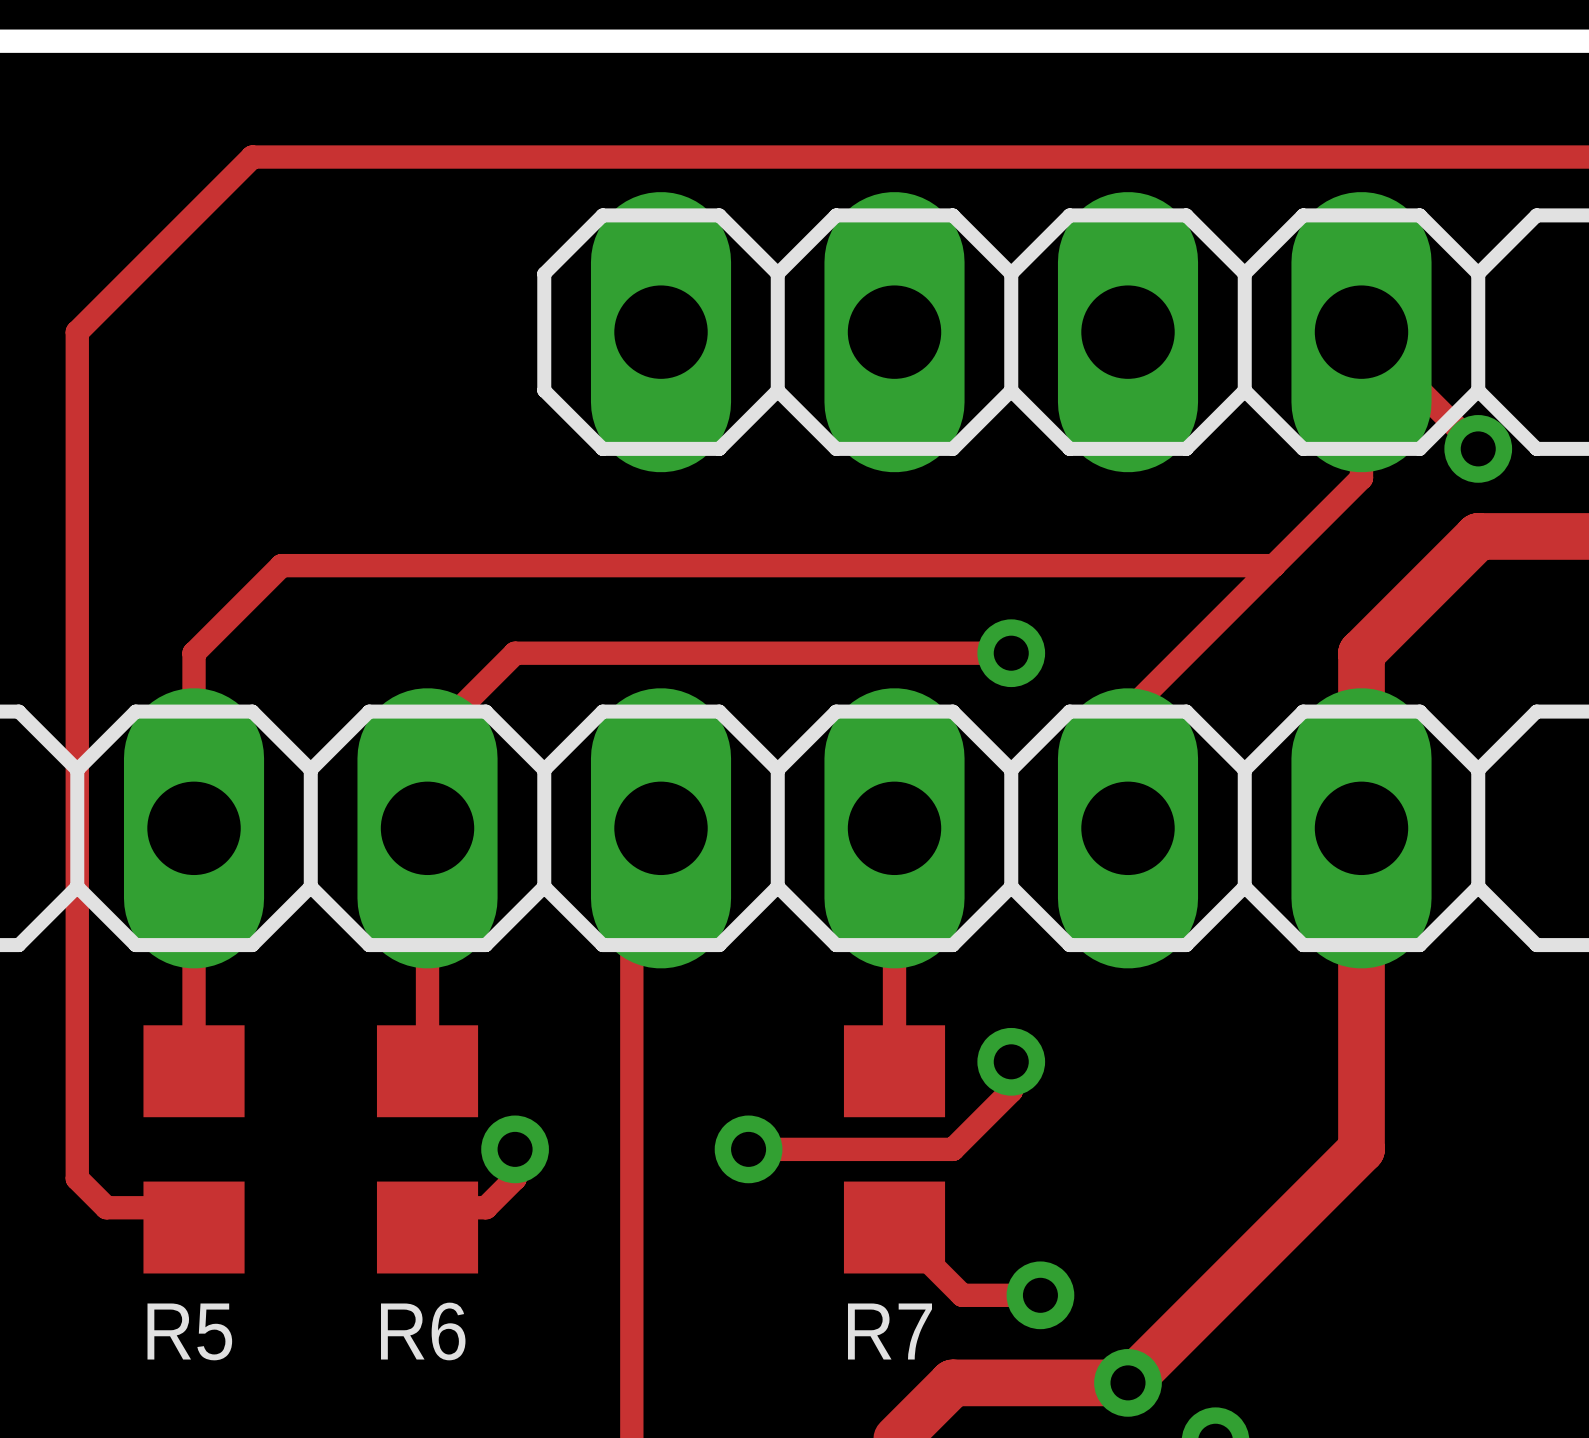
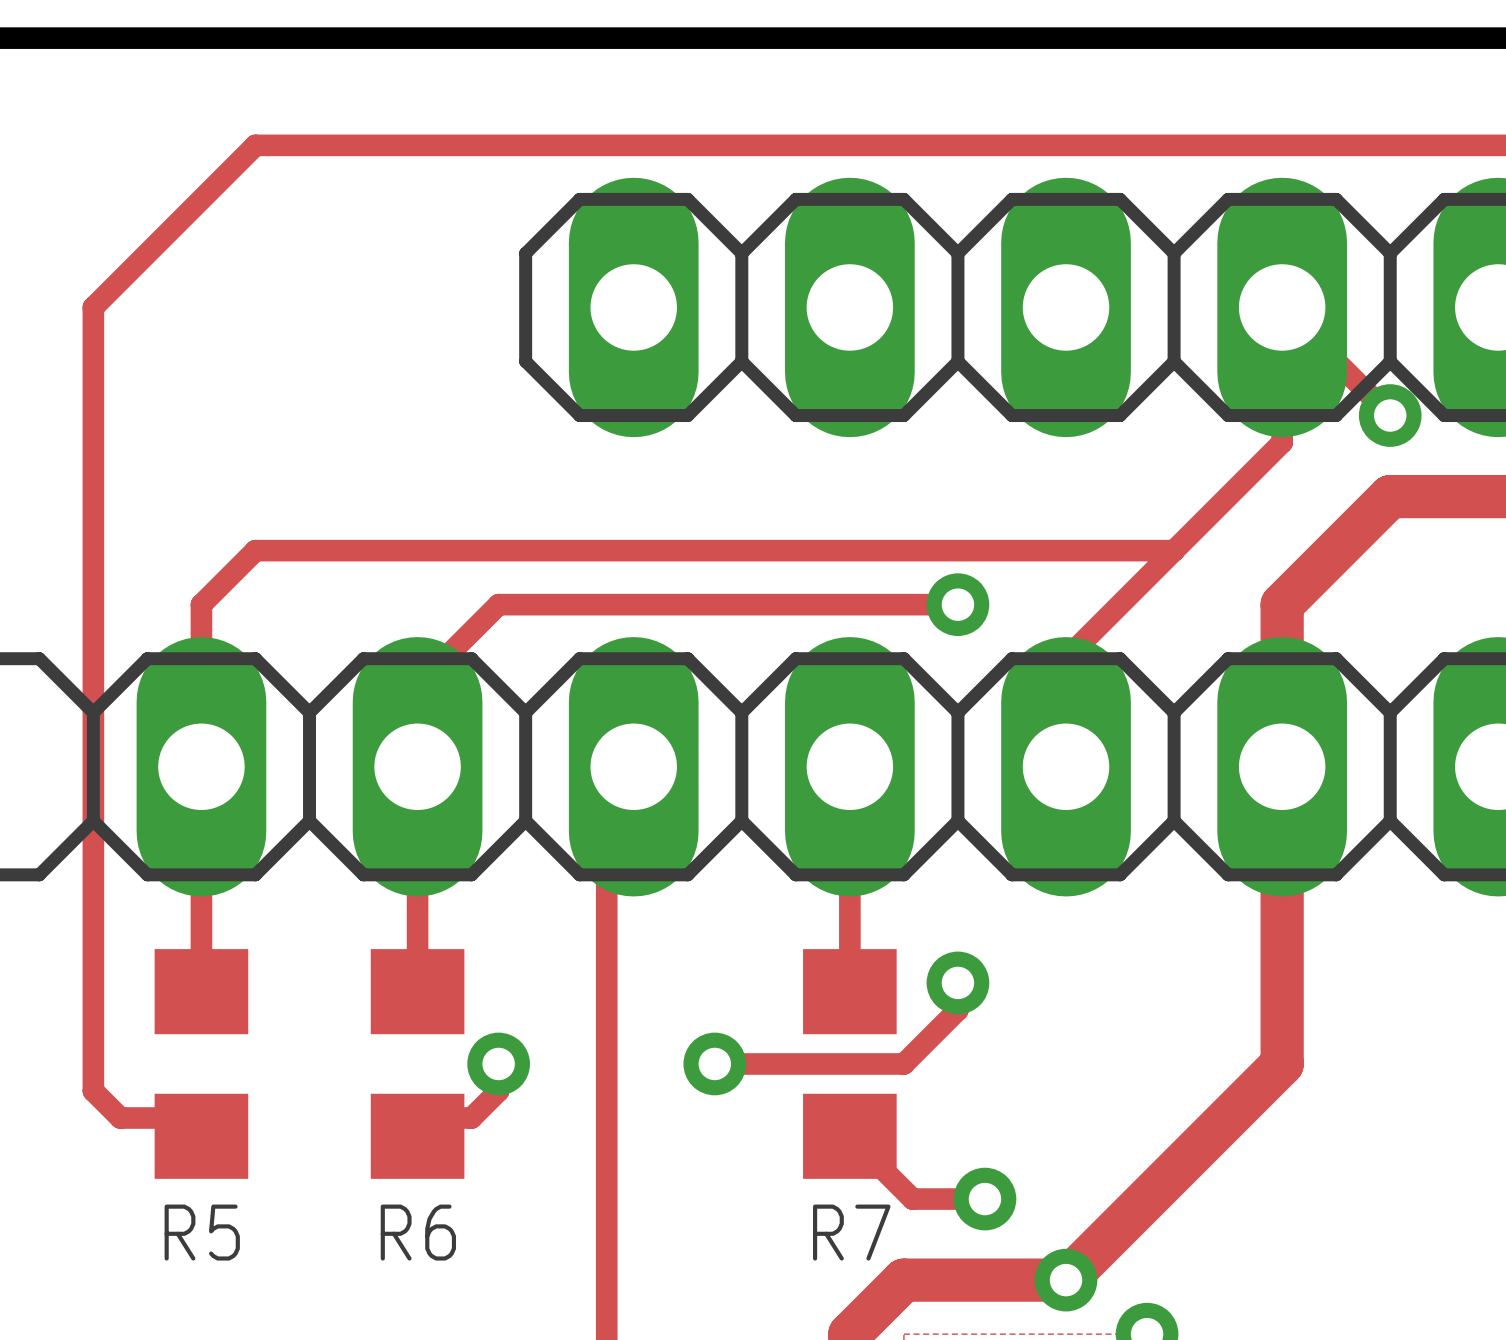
track: (1273, 565) (281, 565) (252, 594) -> (1174, 550) (255, 550)

